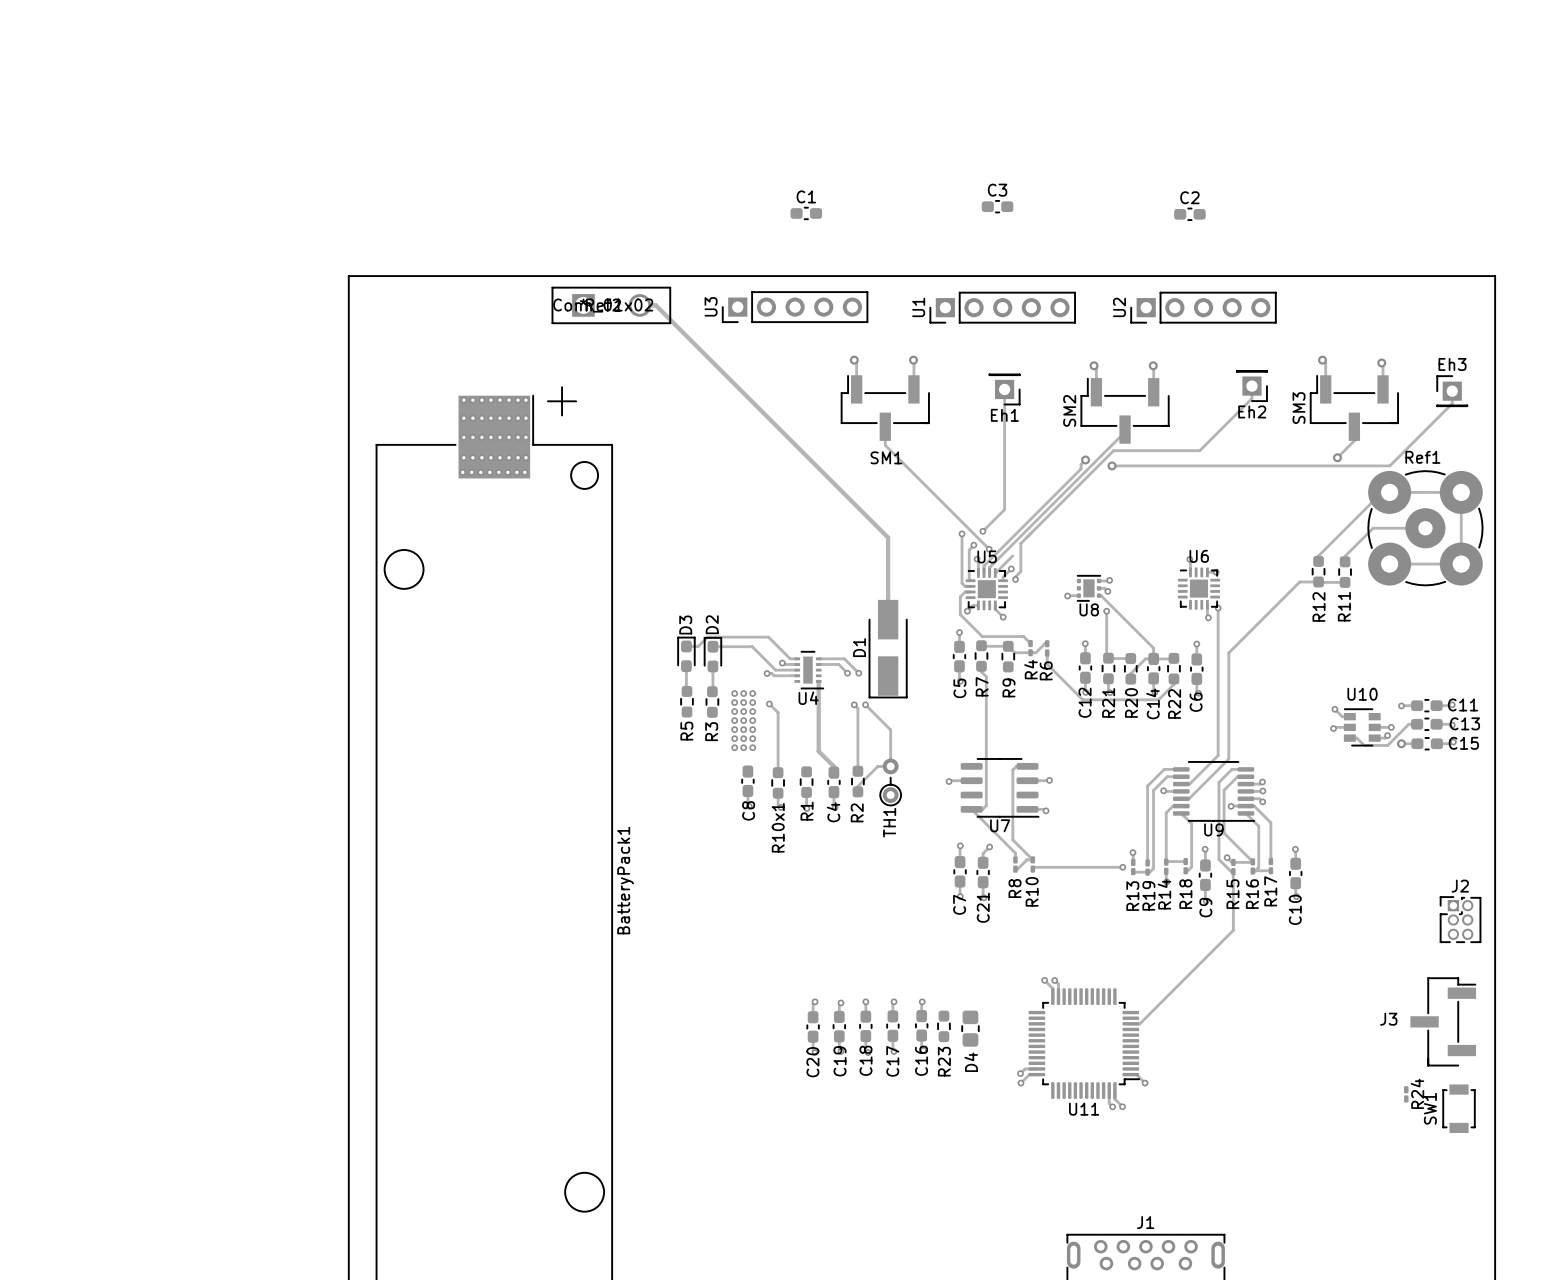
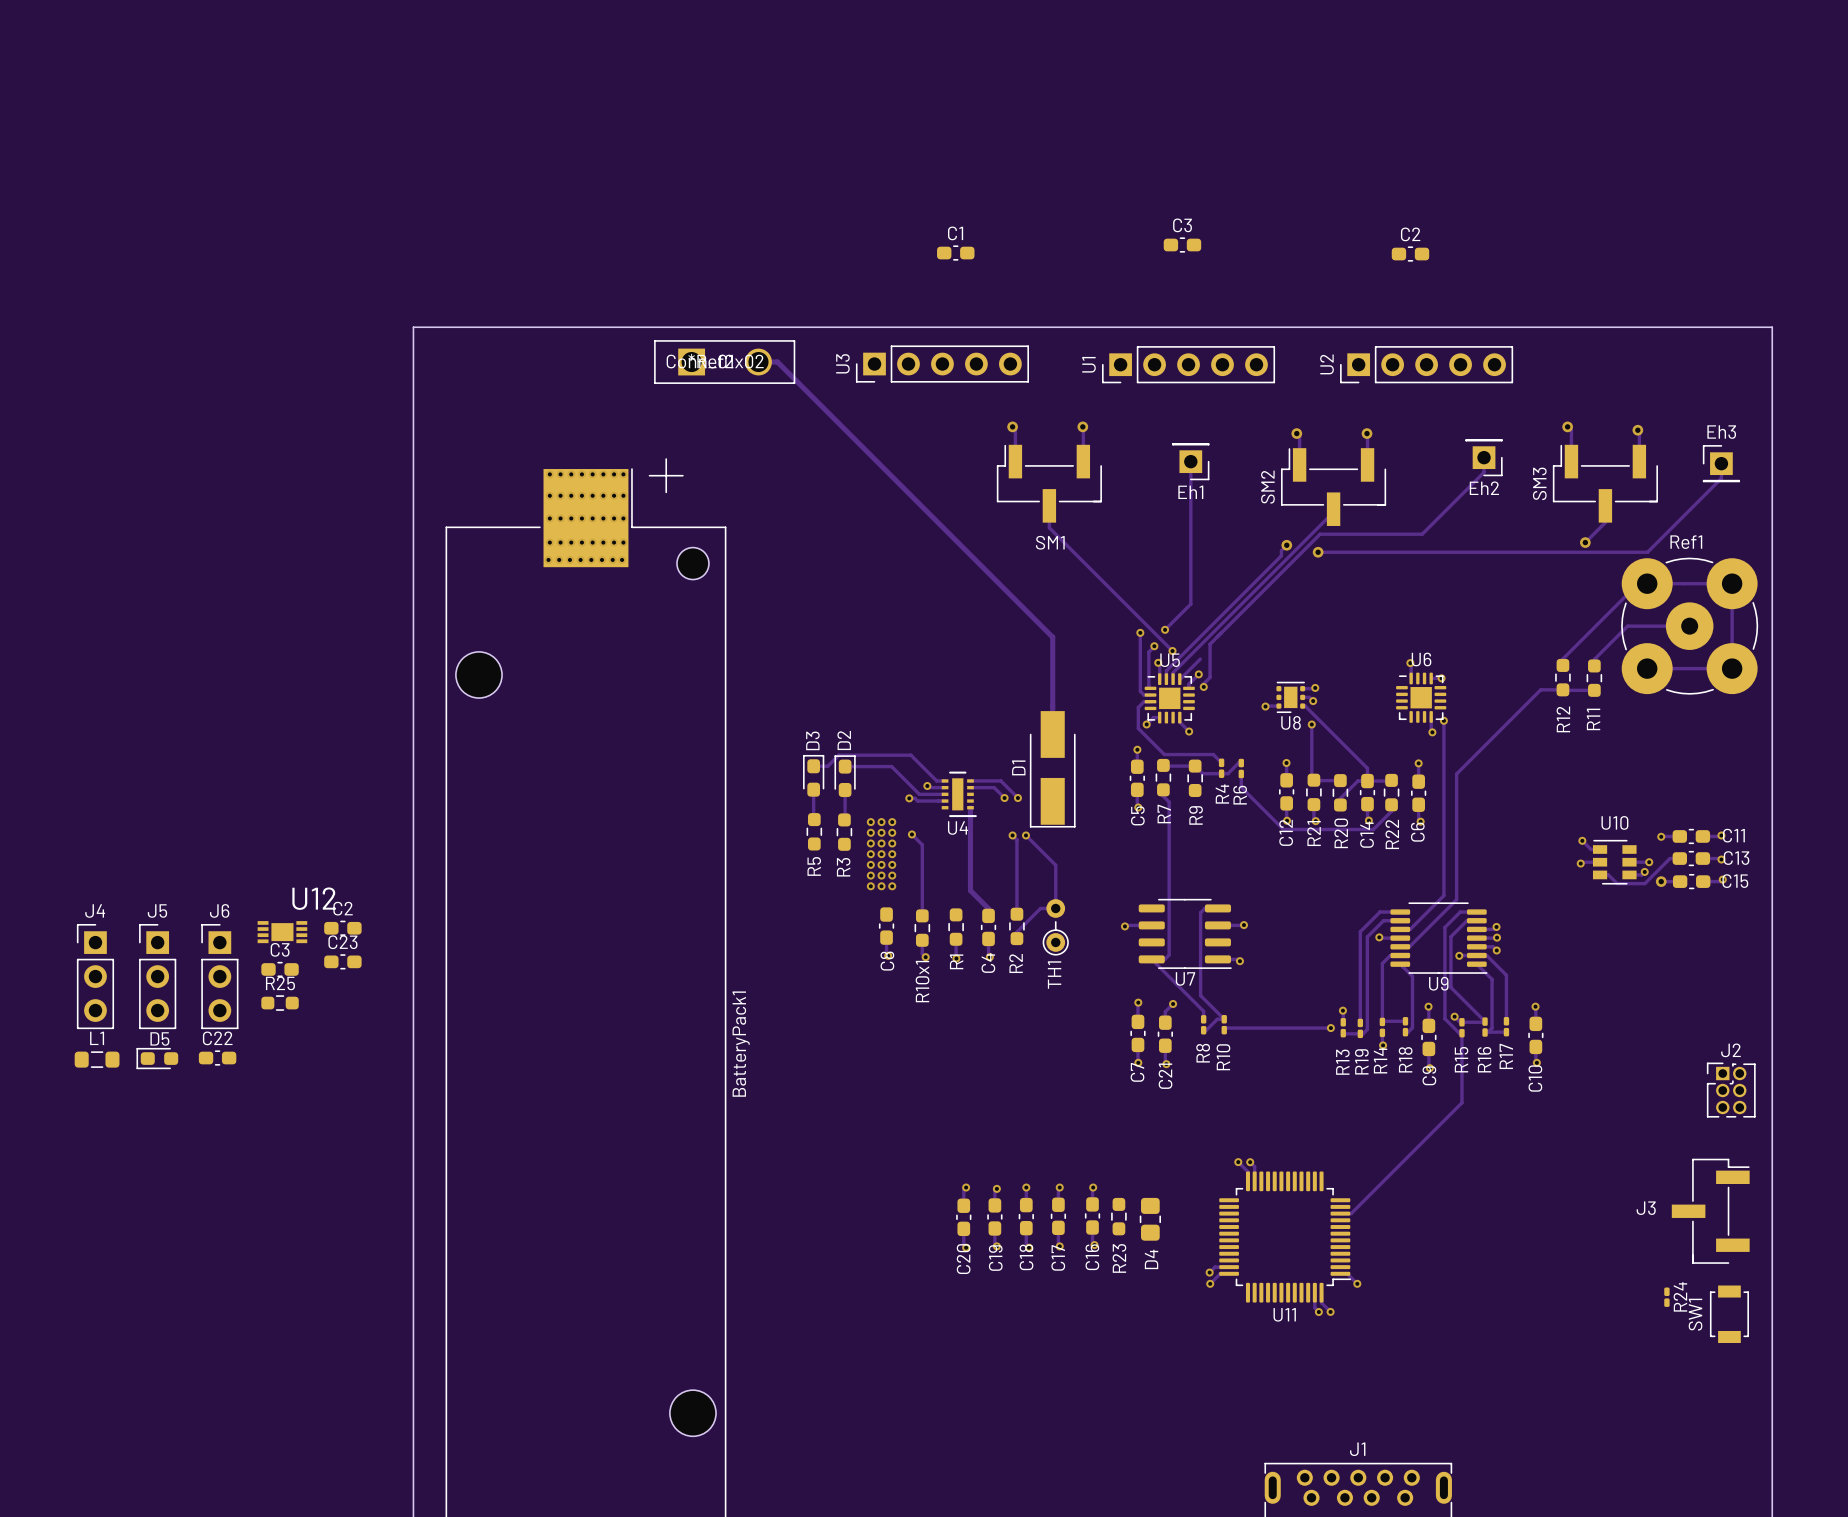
C2: none -> (342, 928)
U12: none -> (282, 932)
C23: none -> (342, 961)
C3: none -> (280, 969)
J4: none -> (95, 976)
J5: none -> (157, 976)
J6: none -> (219, 976)
R25: none -> (280, 1003)
C22: none -> (217, 1058)
L1: none -> (97, 1059)
D5: none -> (157, 1058)

